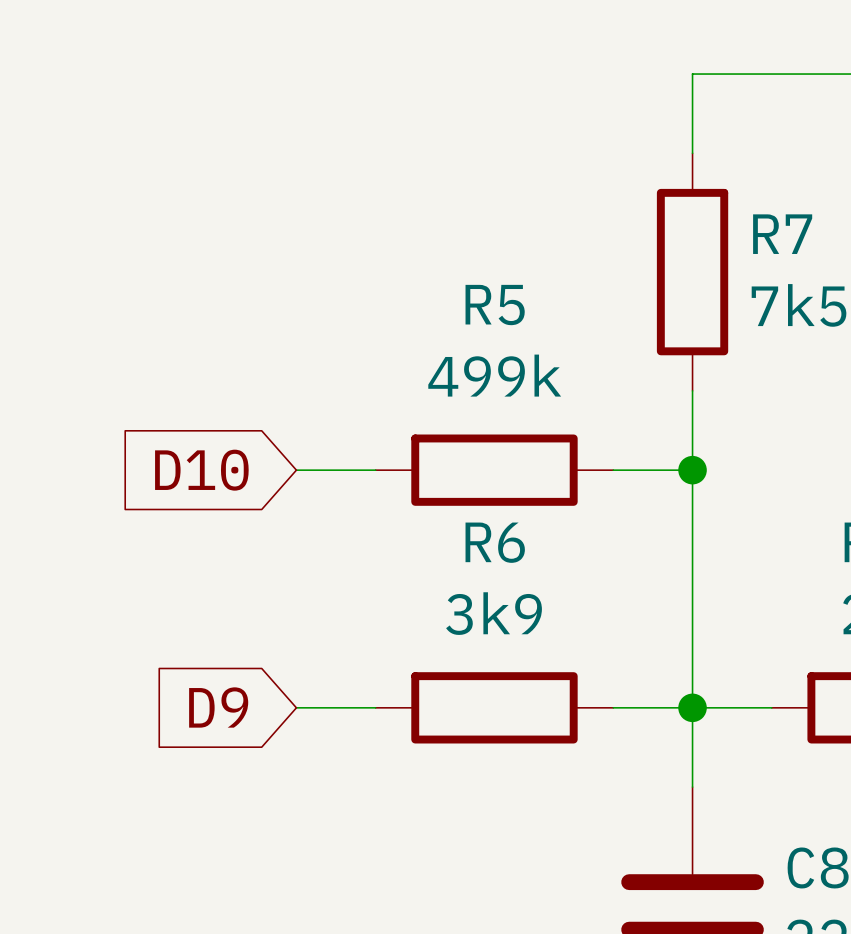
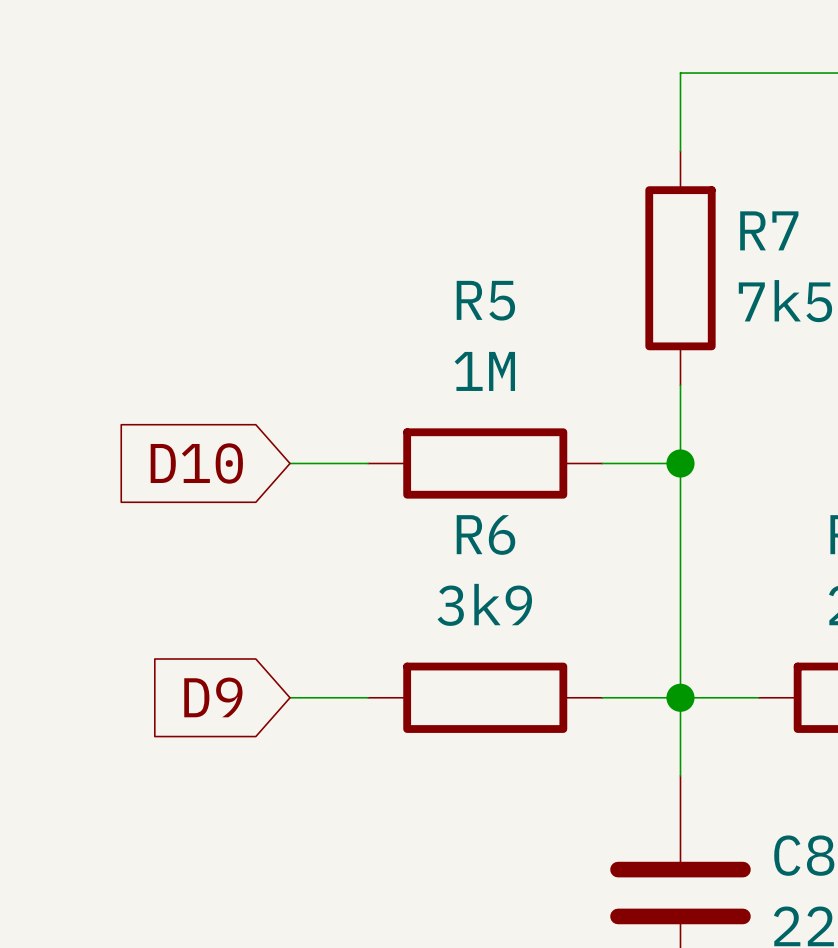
R5 value: 499k (494, 375) -> 1M (484, 371)

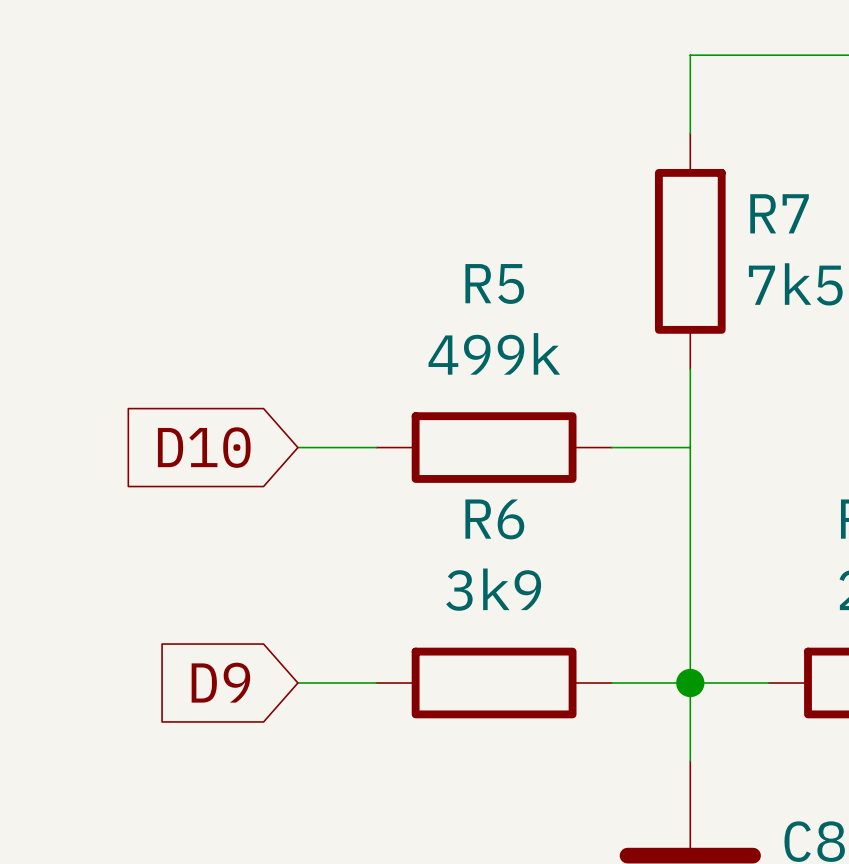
R5 value: 1M (484, 371) -> 499k (494, 353)
junction: (680, 463) -> none

